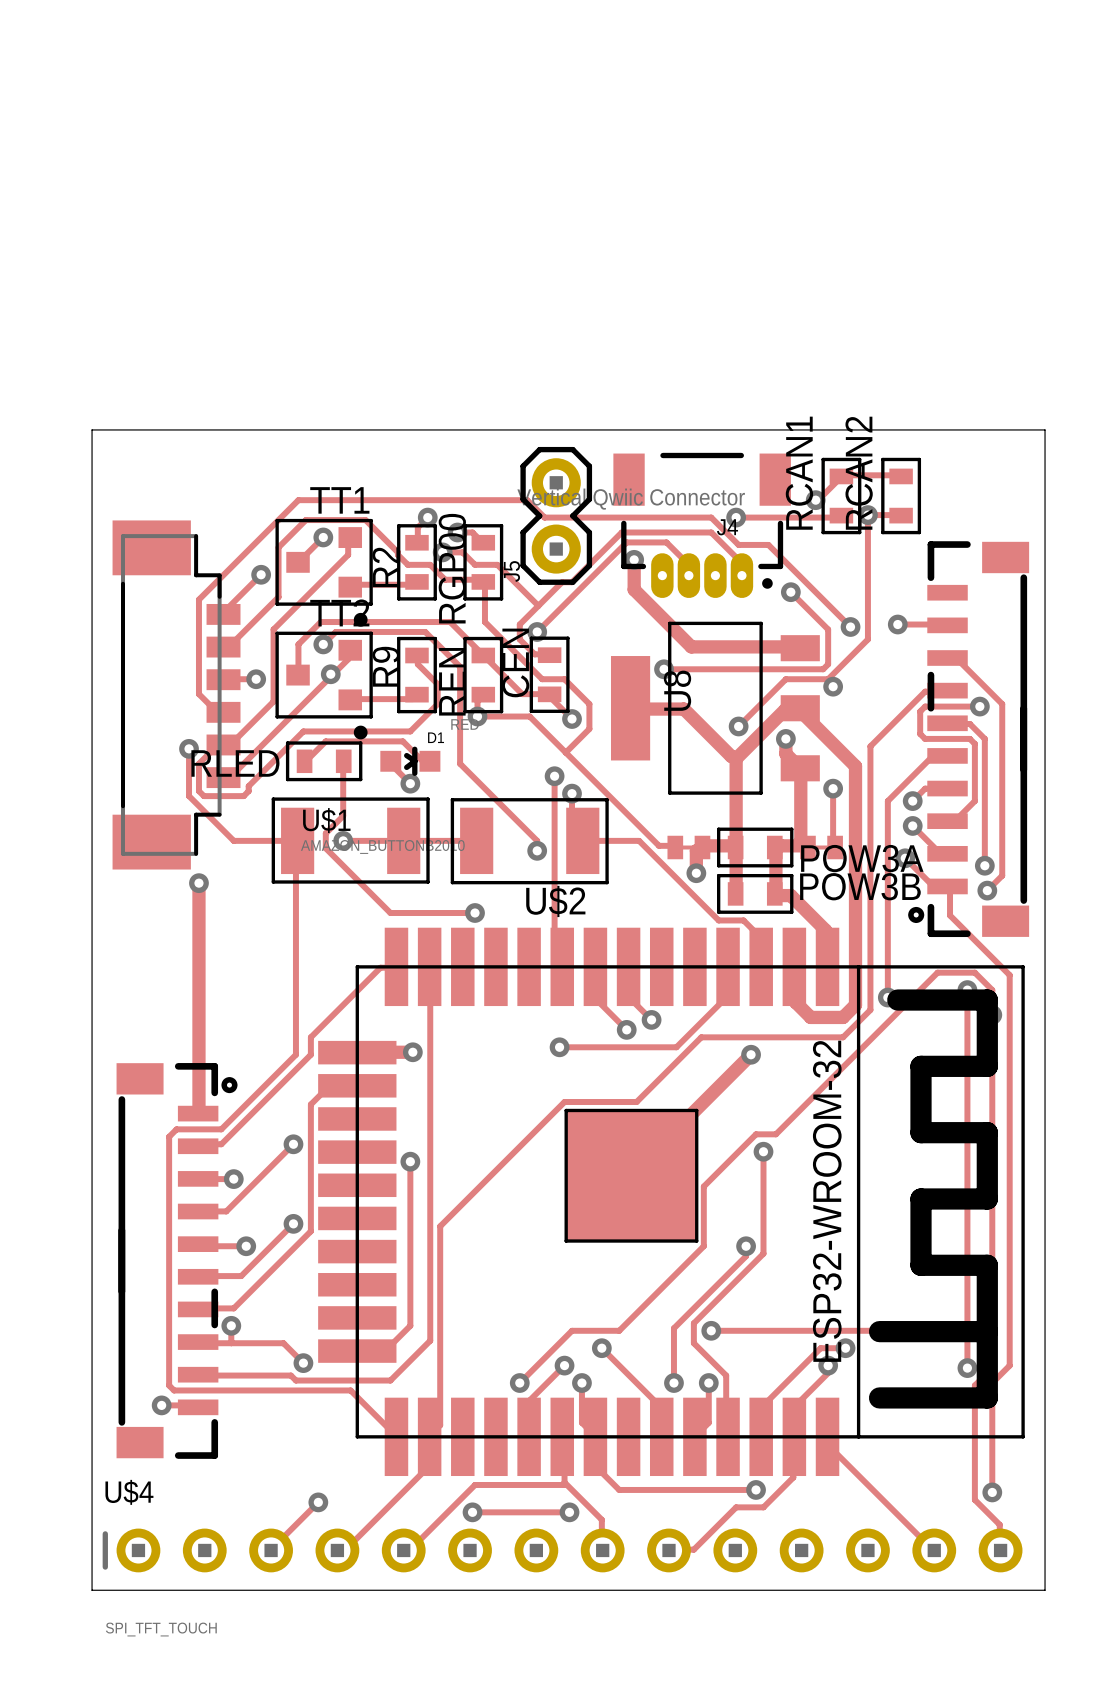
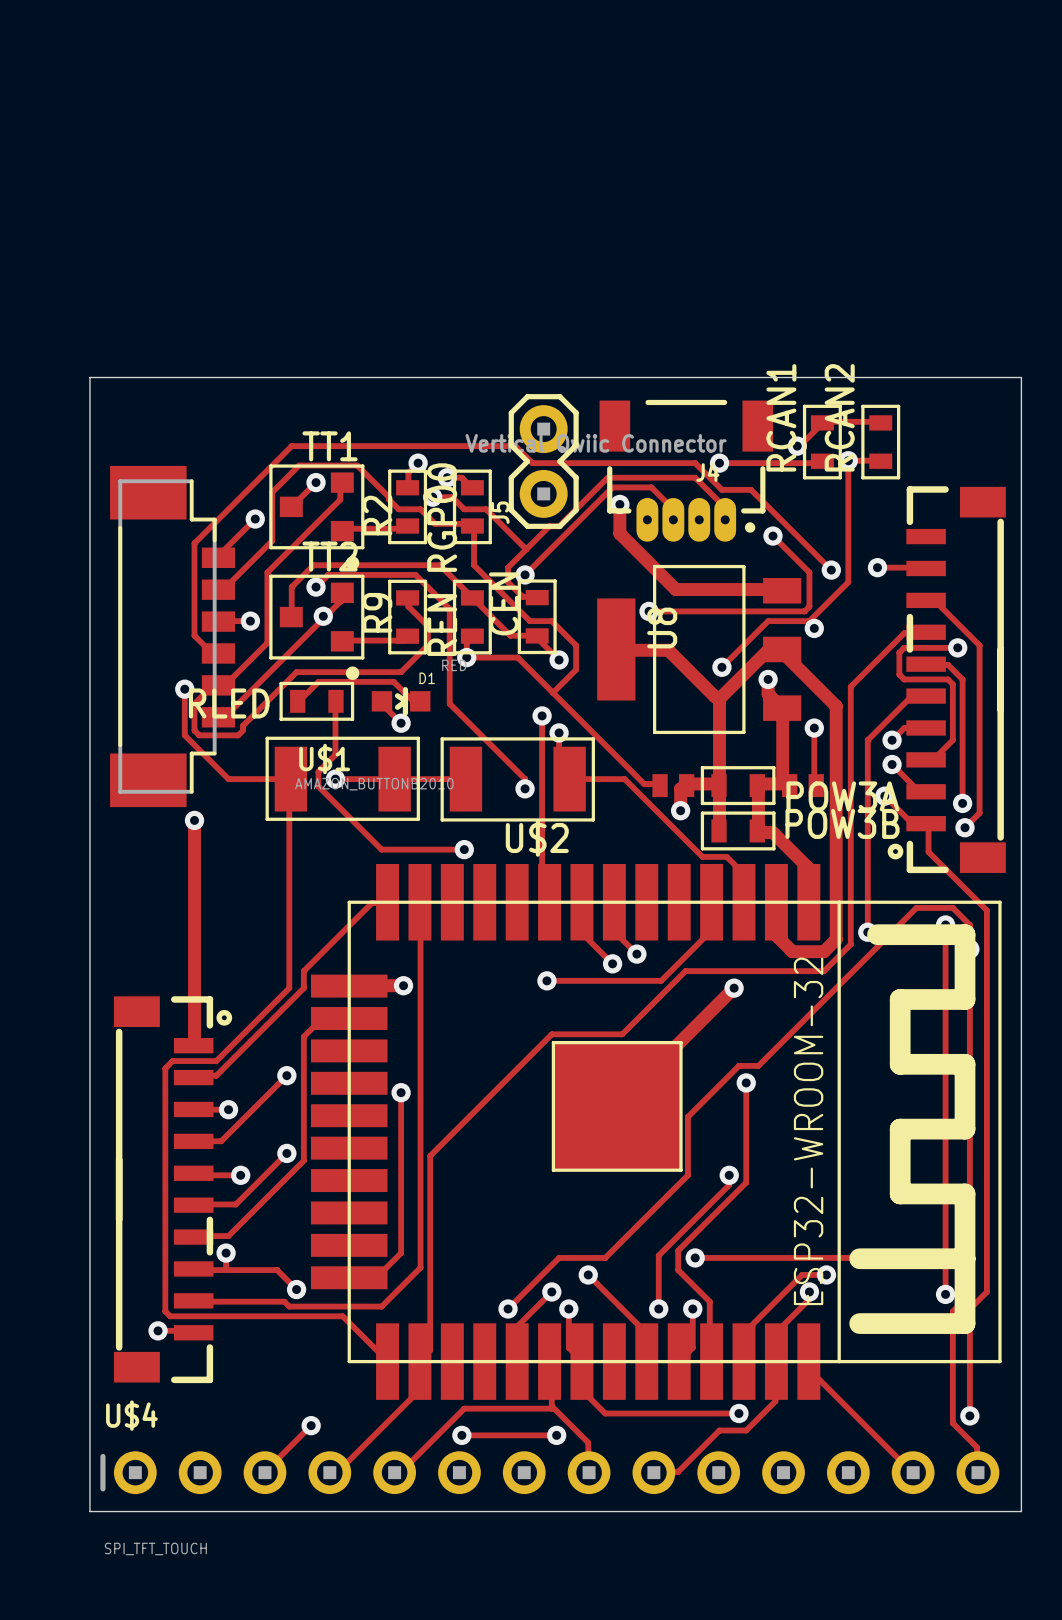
track: (682, 847) (695, 847) -> none
track: (814, 847) (828, 847) -> none

